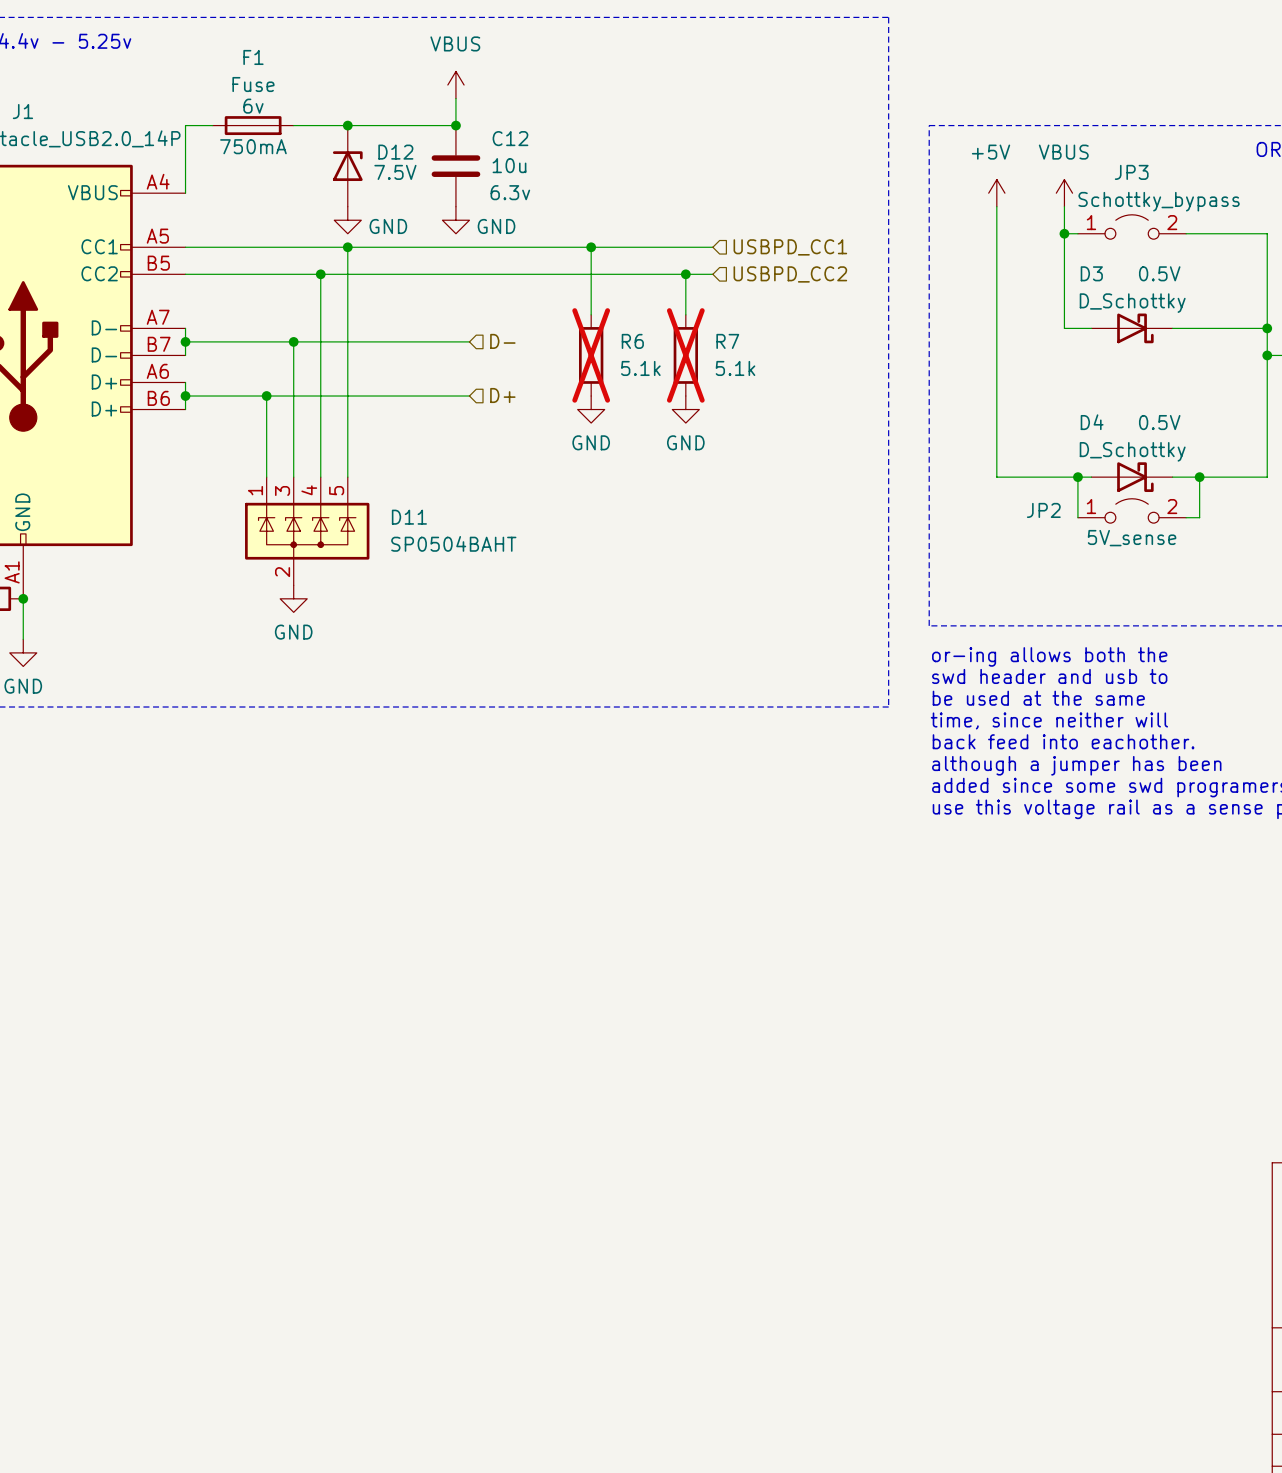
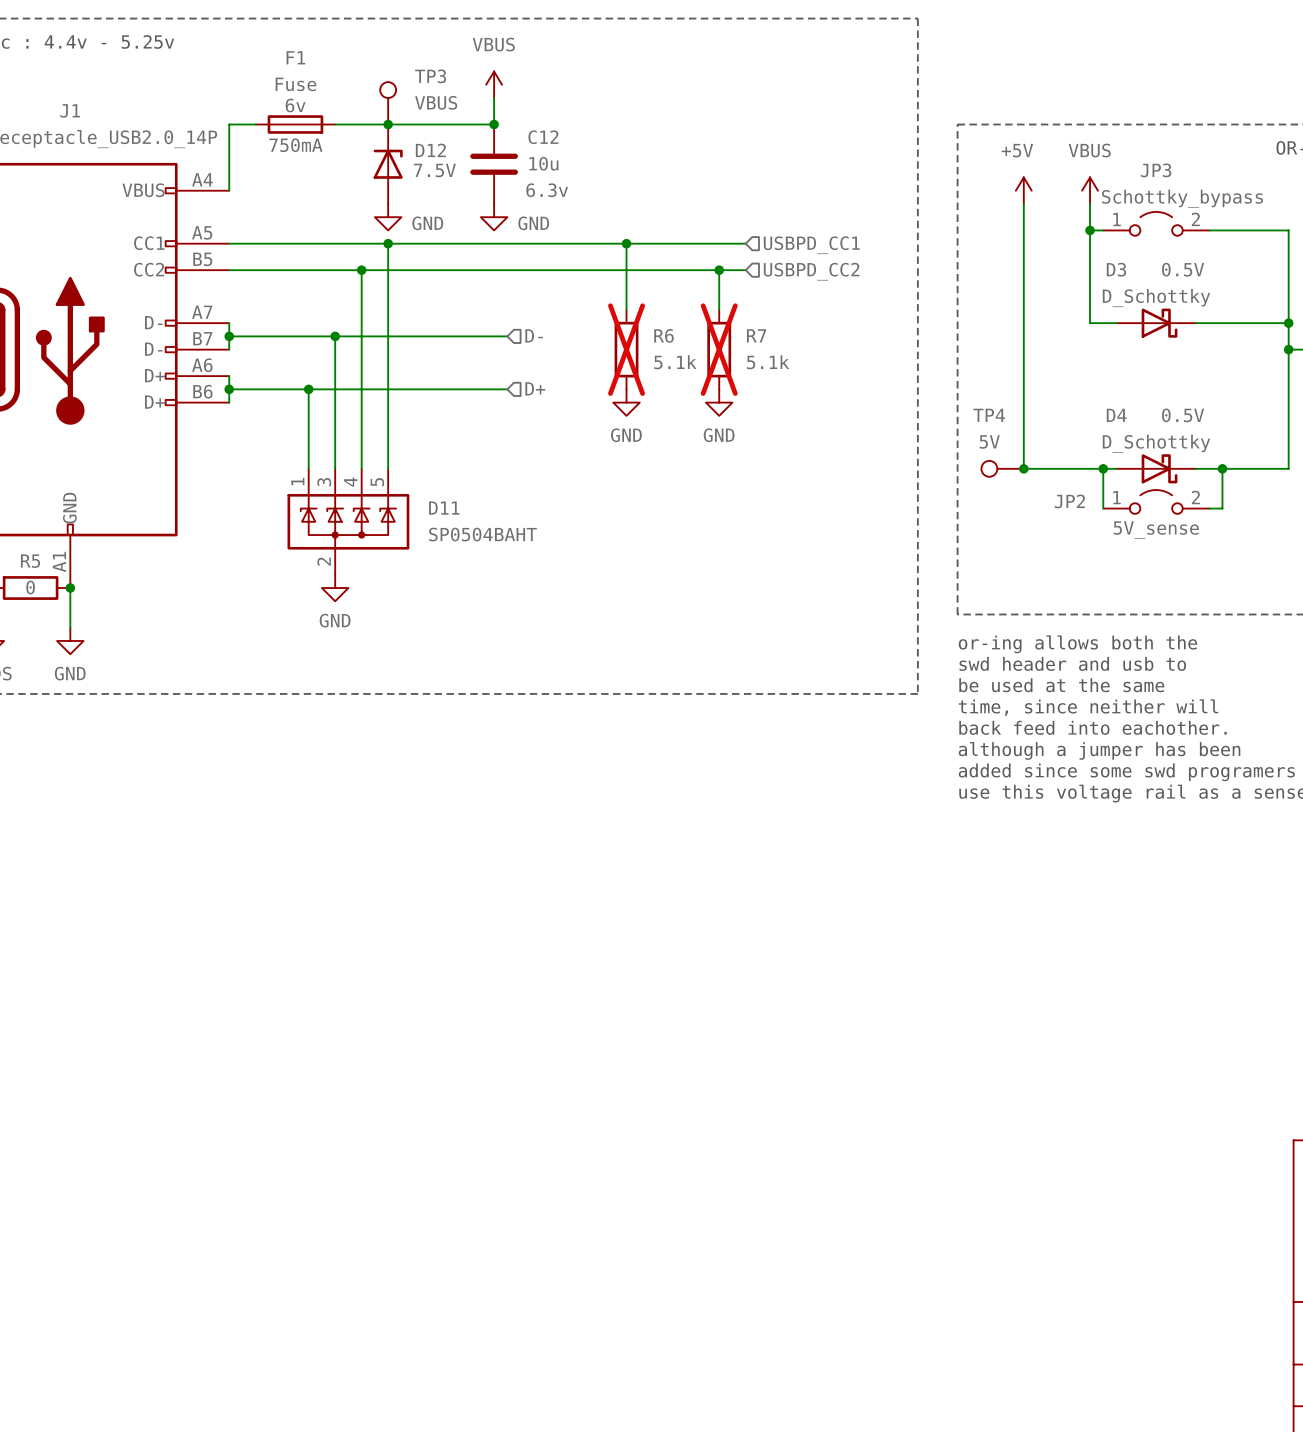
TP3: none -> VBUS (388, 103)
TP4: none -> 5V (1002, 468)
junction: none -> (1023, 468)

